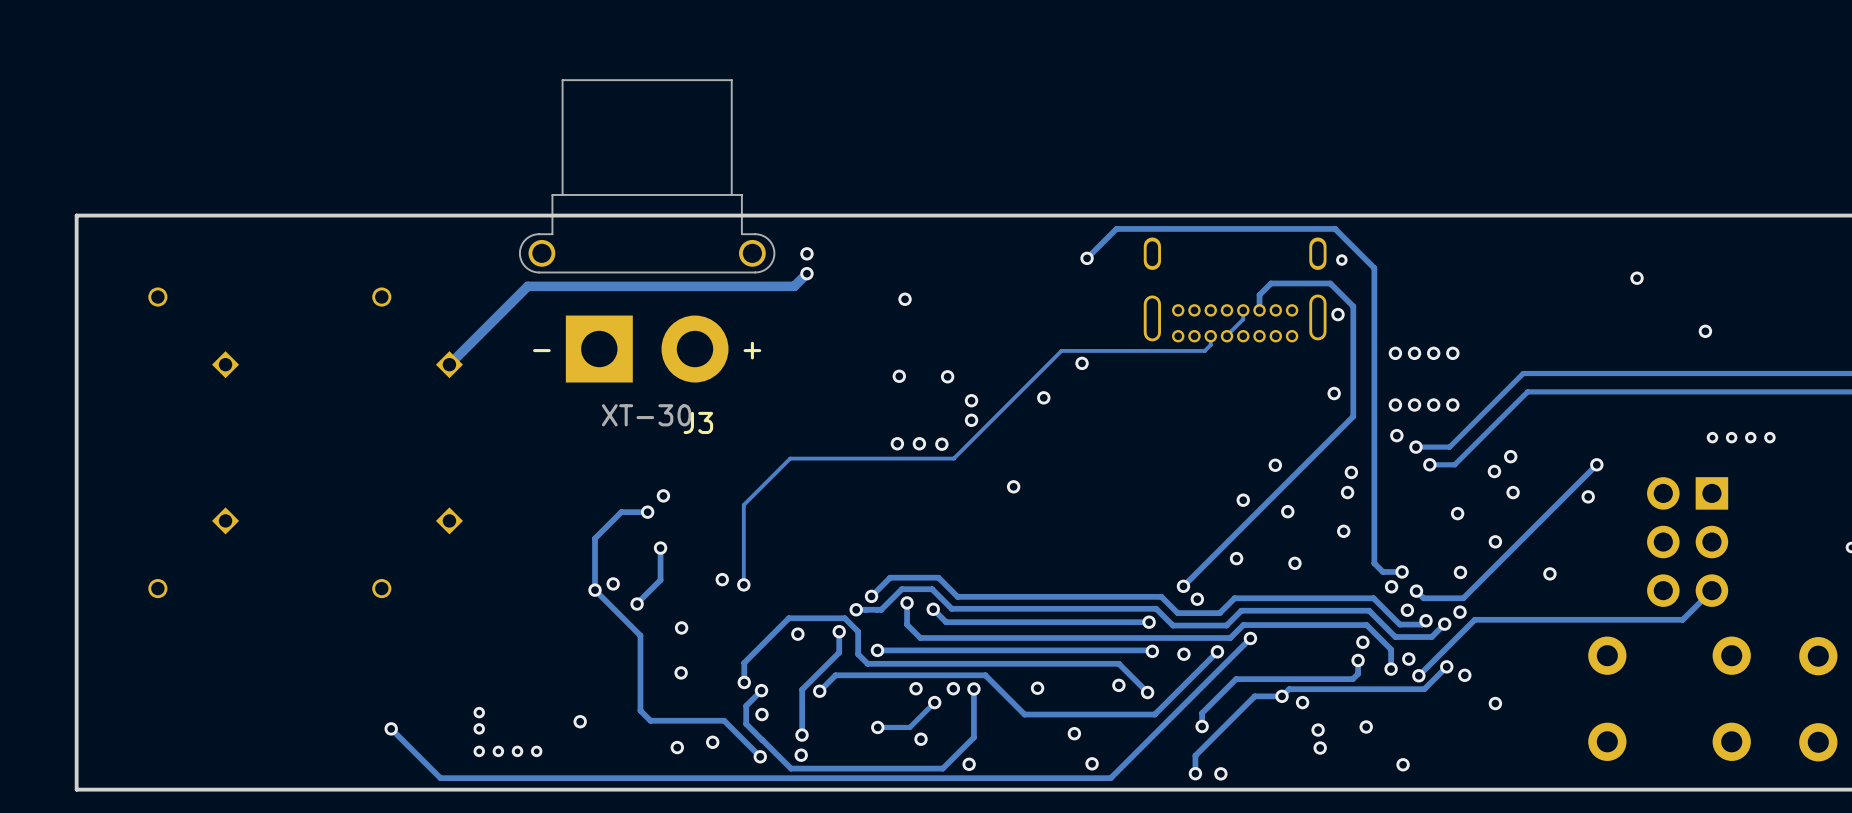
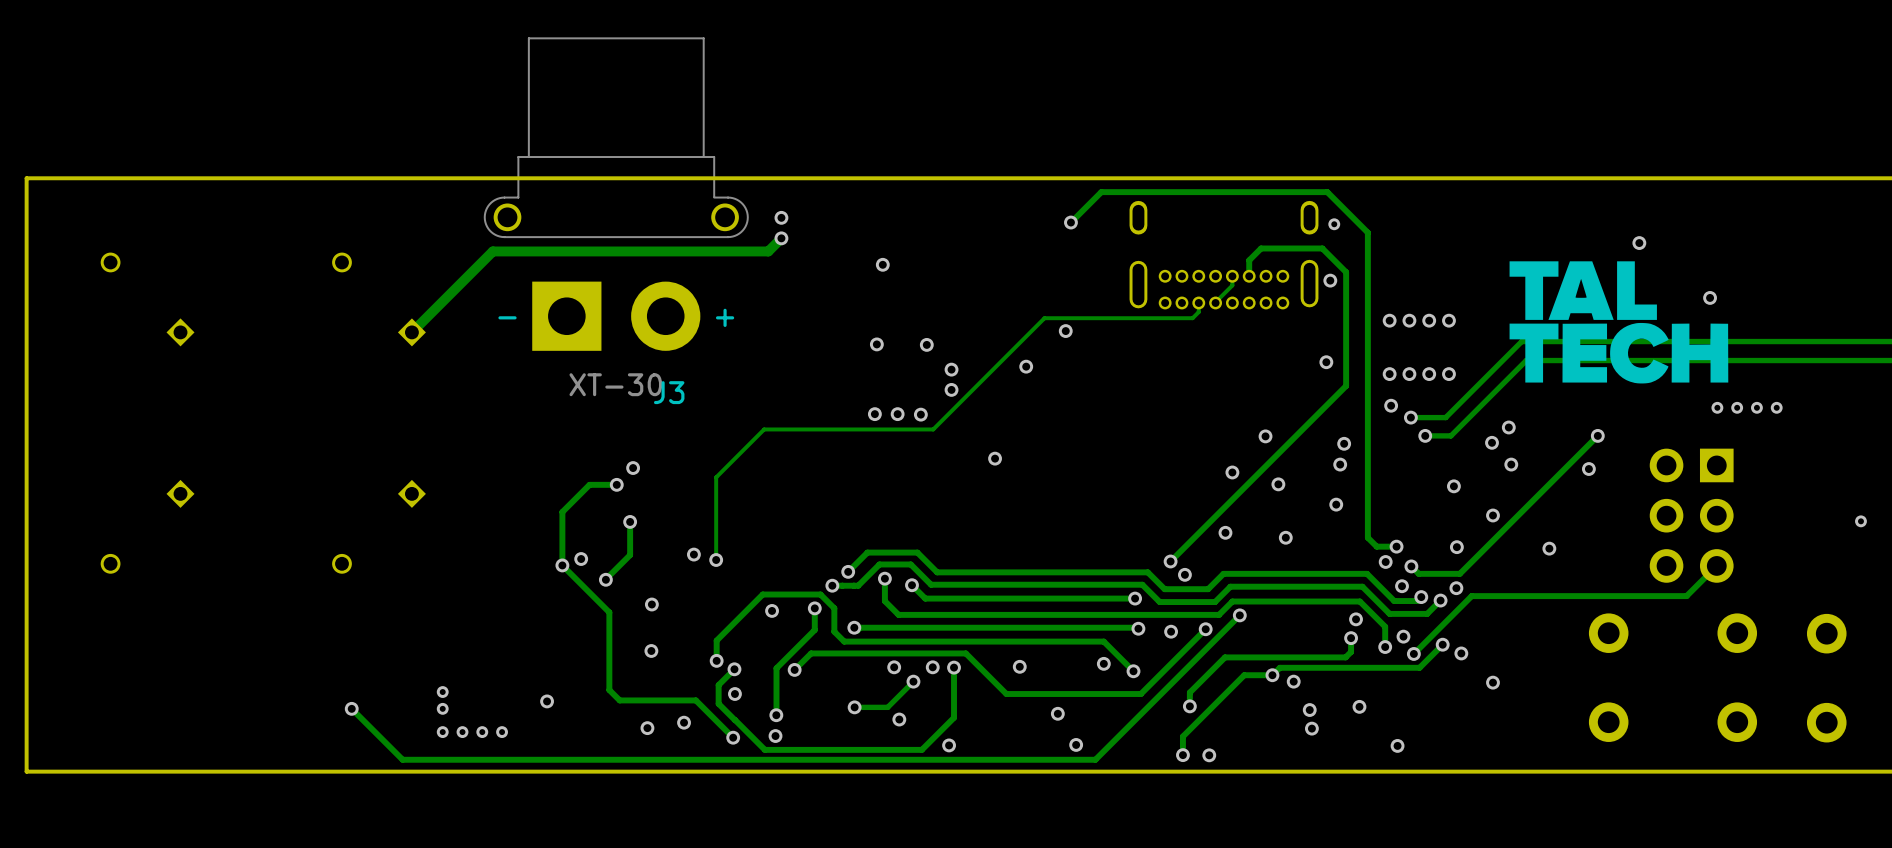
drawing: none -> [1509, 261, 1729, 384]

